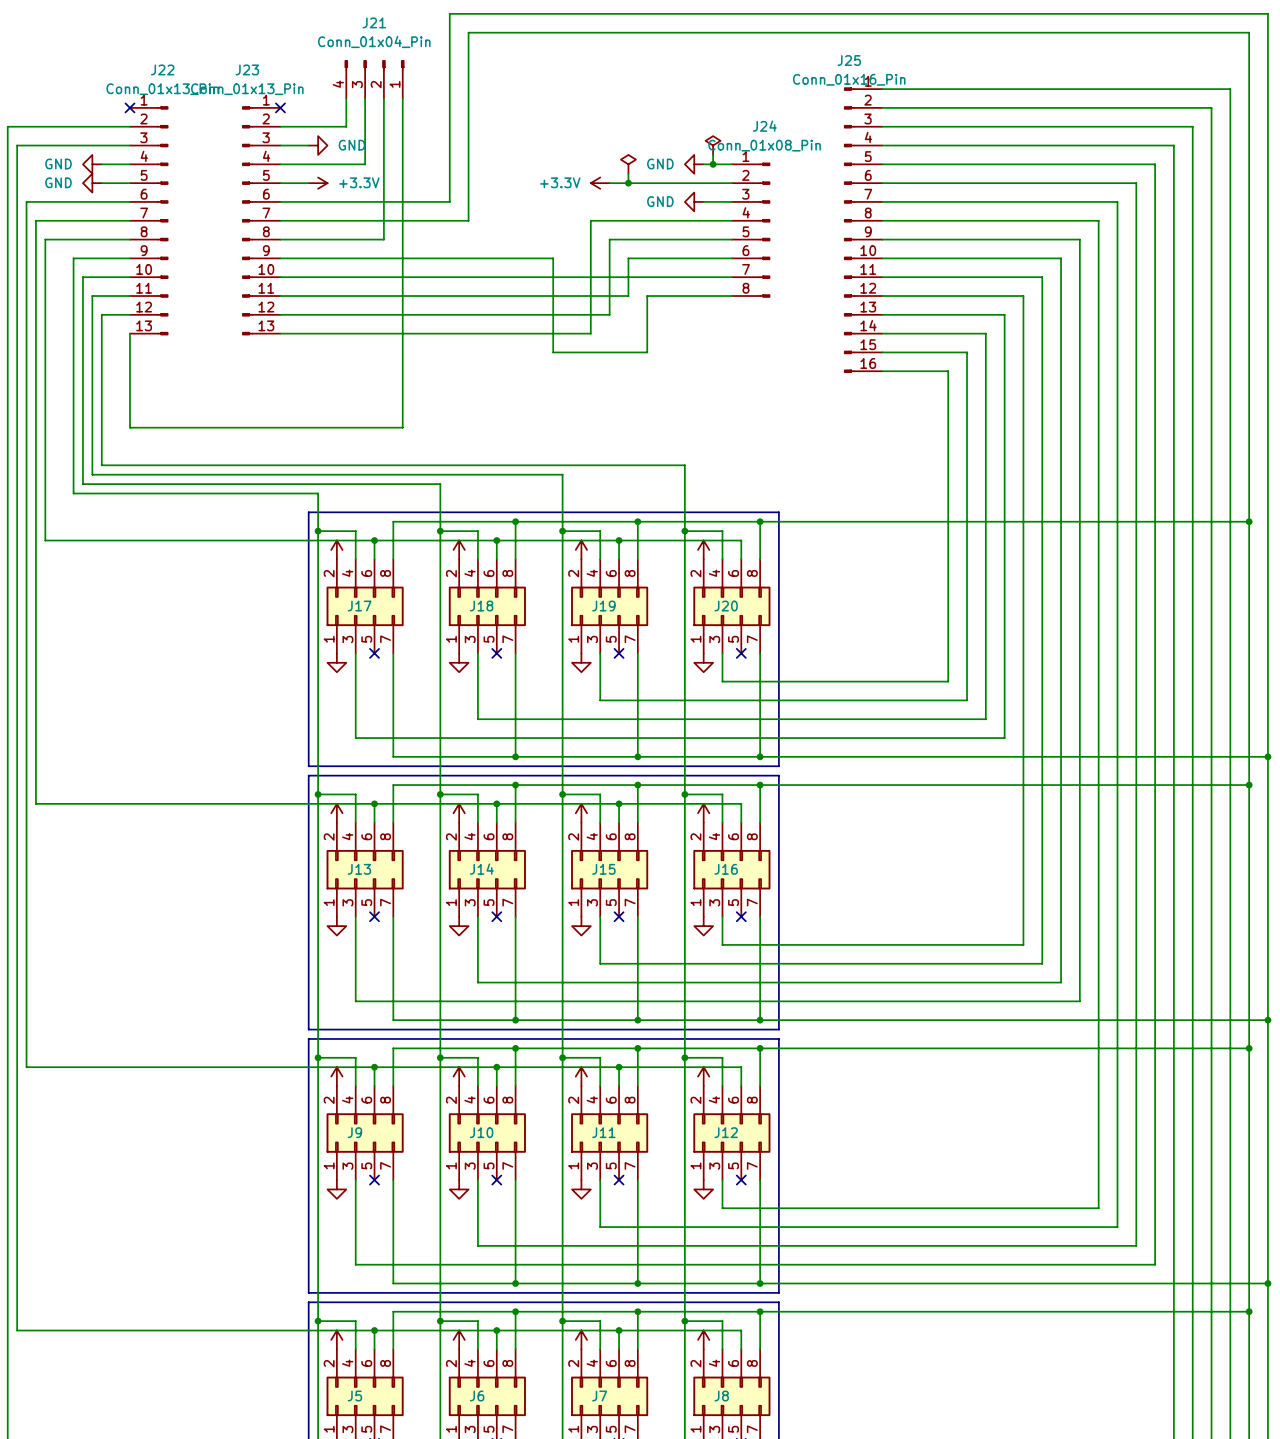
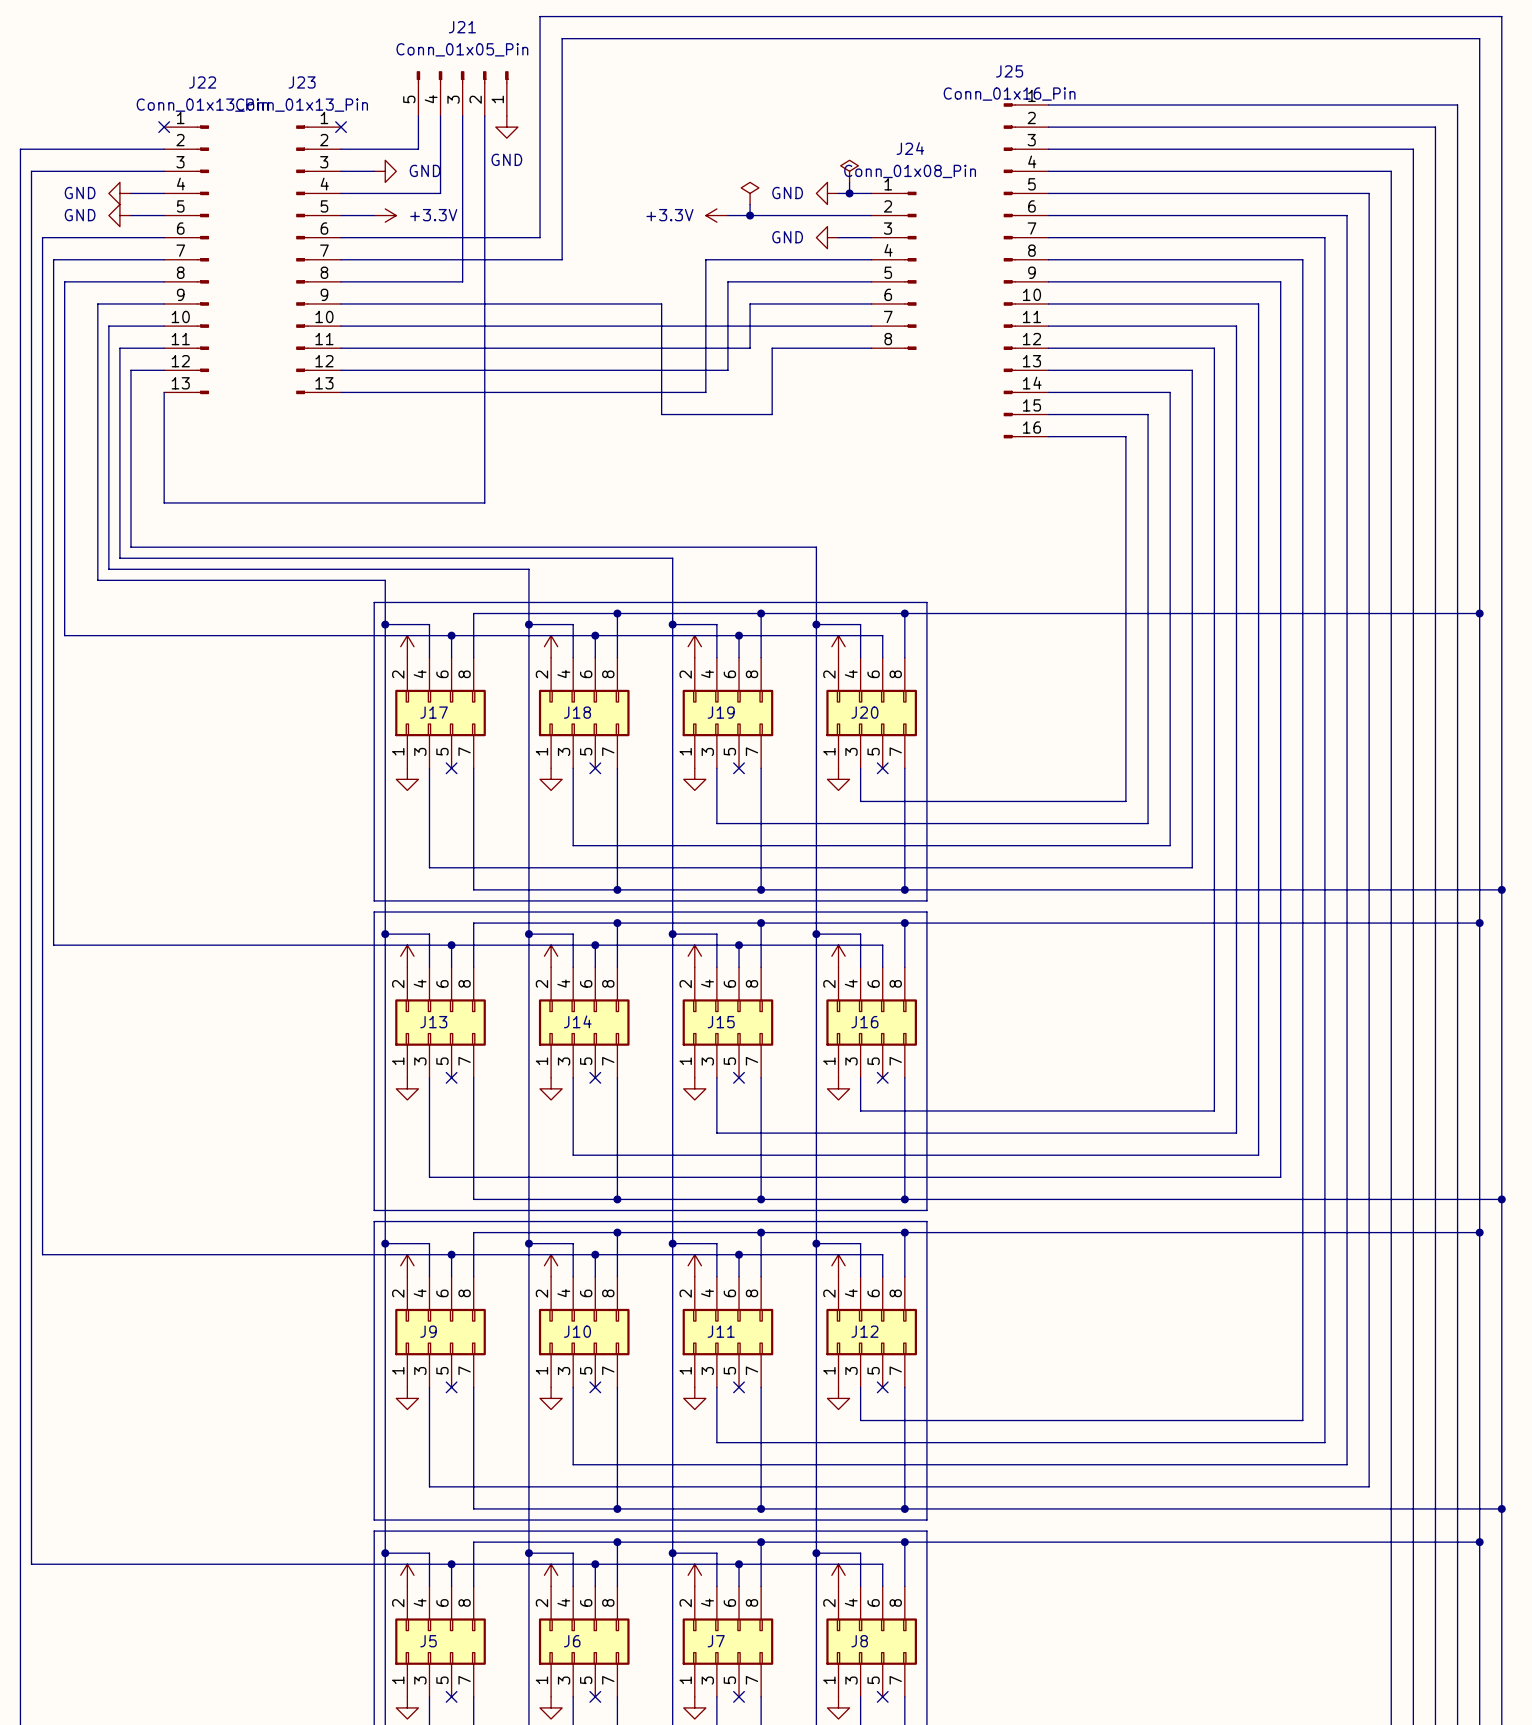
J21 value: Conn_01x04_Pin (374, 41) -> Conn_01x05_Pin (462, 49)
J21 symbol: [344, 60, 405, 99] -> [416, 71, 509, 117]
power symbol: none -> GND (506, 127)

